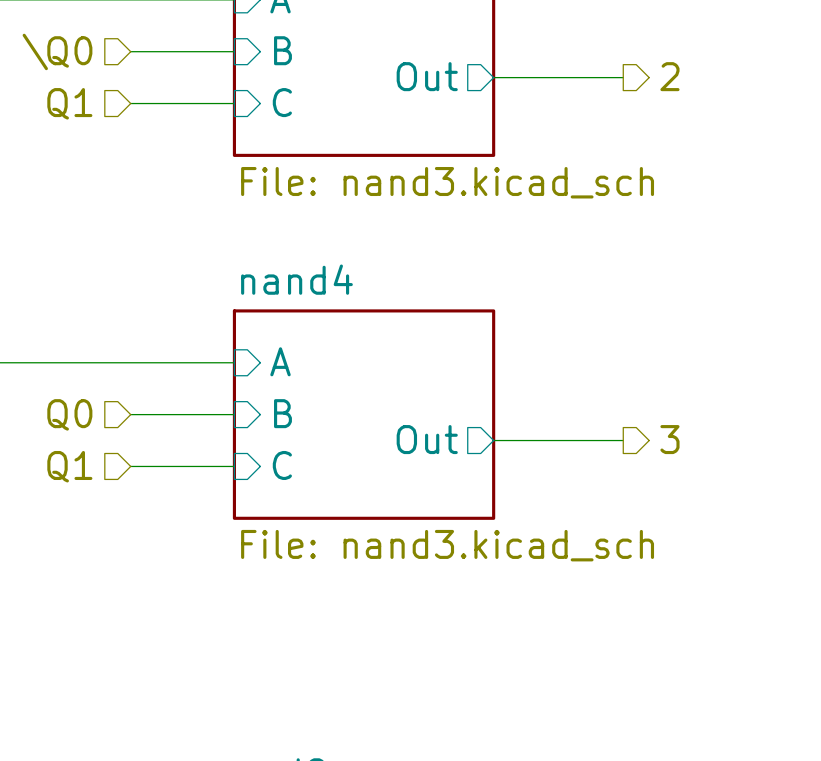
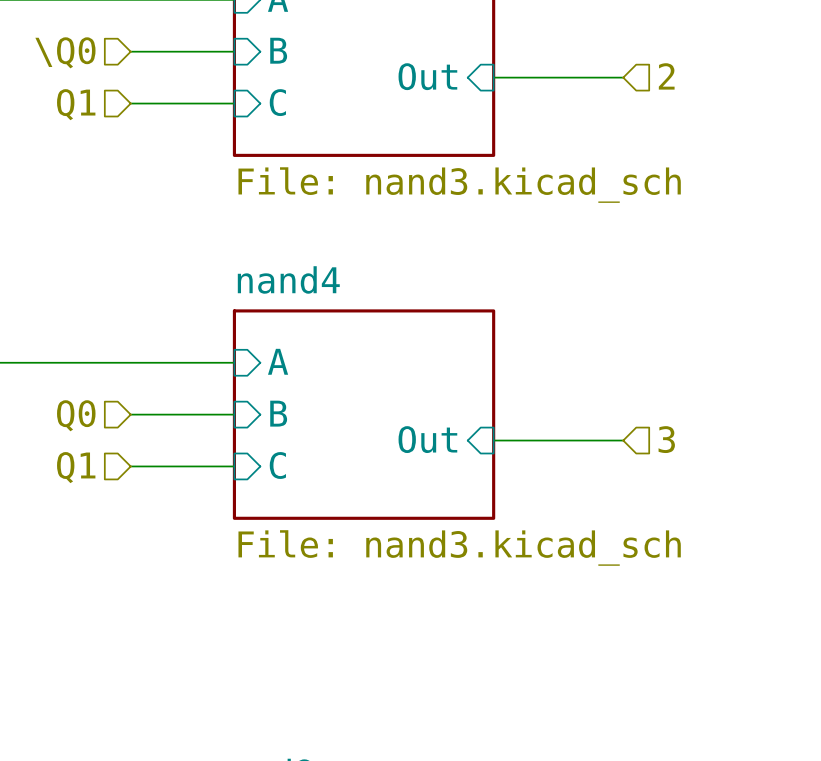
sheet pin shape: output (427, 76) -> input (427, 76)
hierarchical label shape: output (669, 76) -> input (666, 76)
sheet pin shape: output (427, 439) -> input (427, 439)
hierarchical label shape: output (669, 439) -> input (666, 439)

